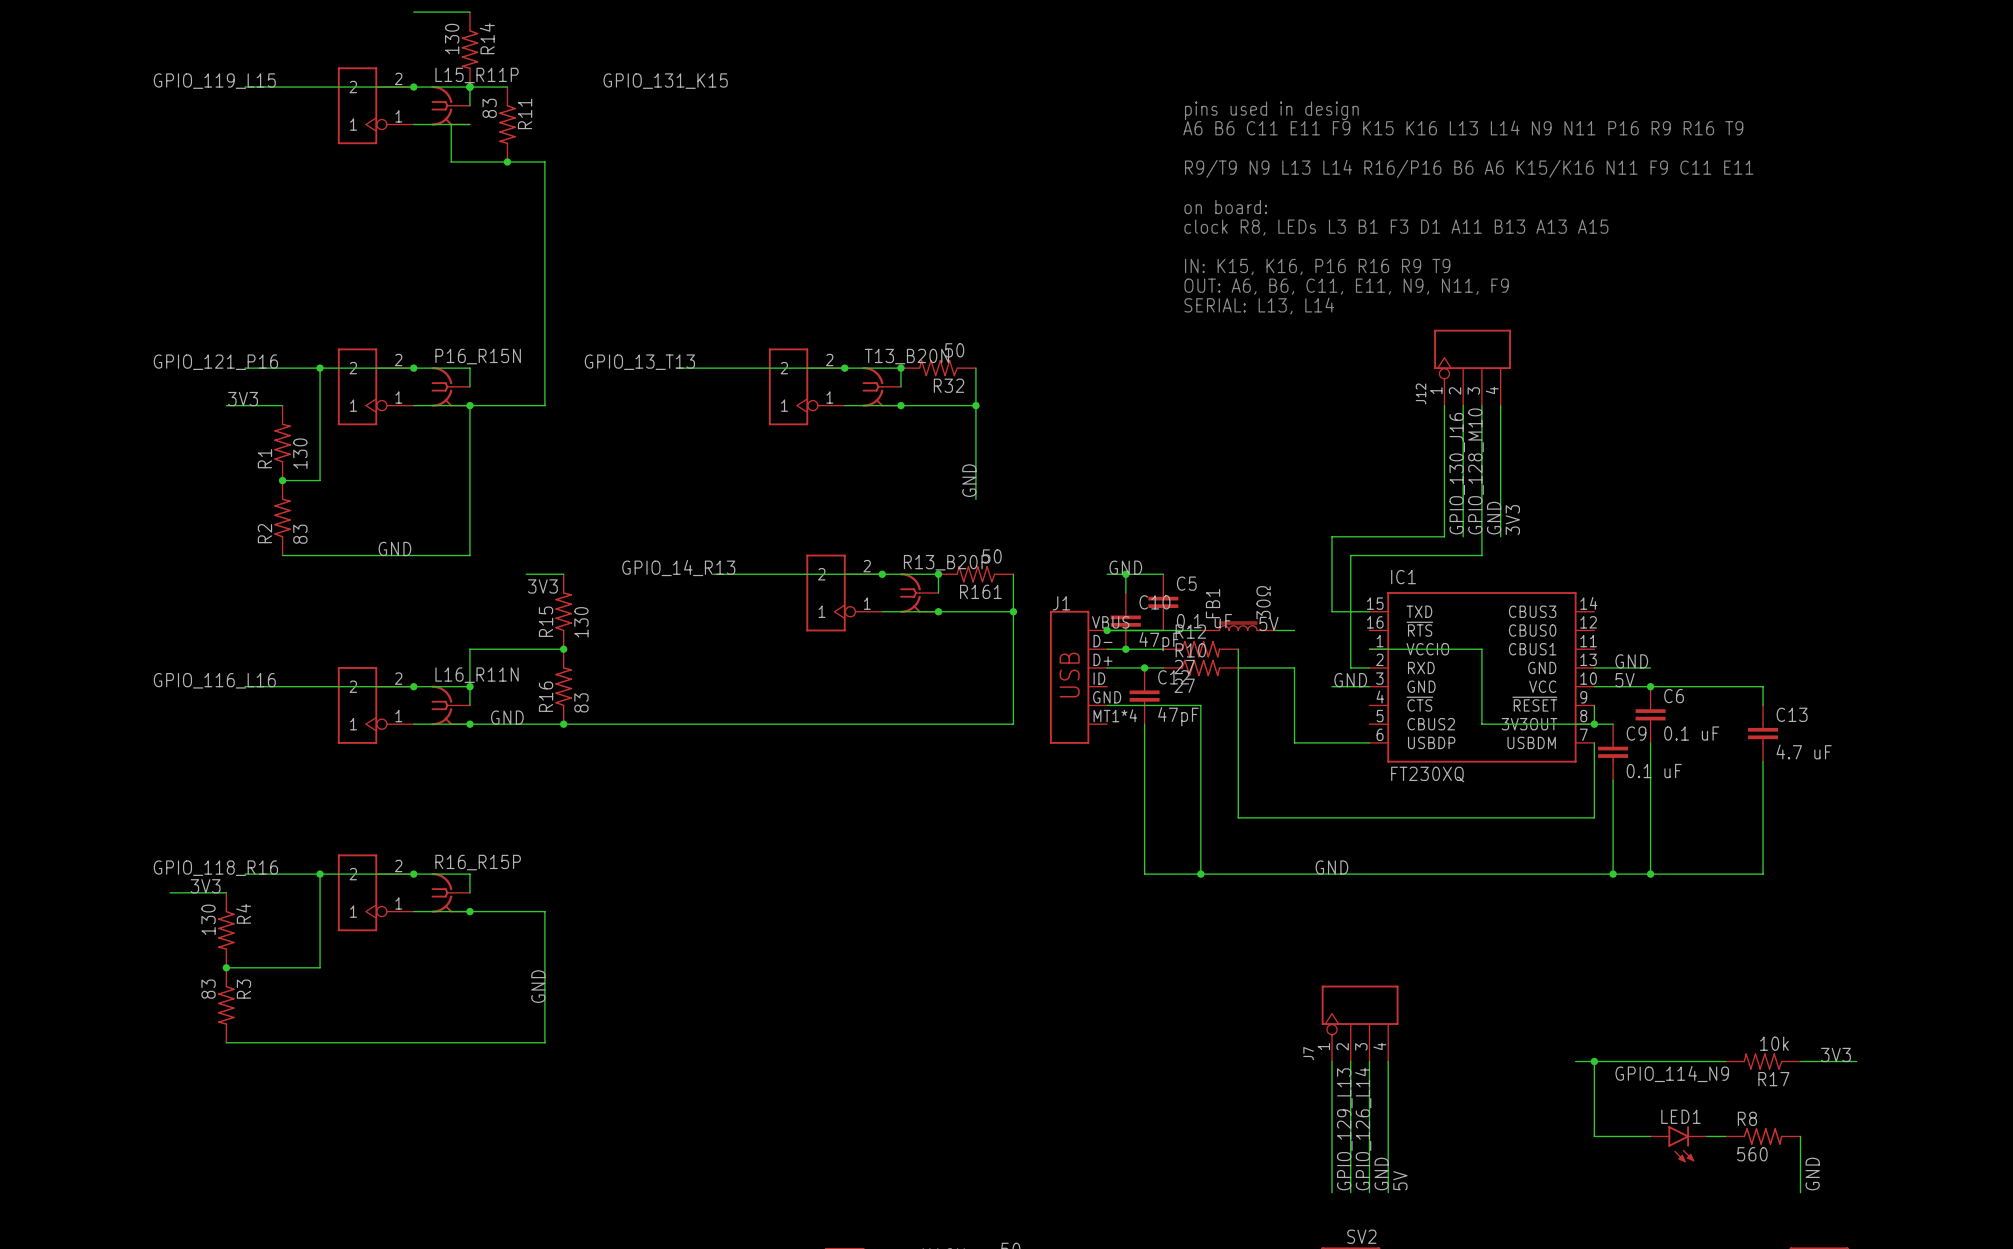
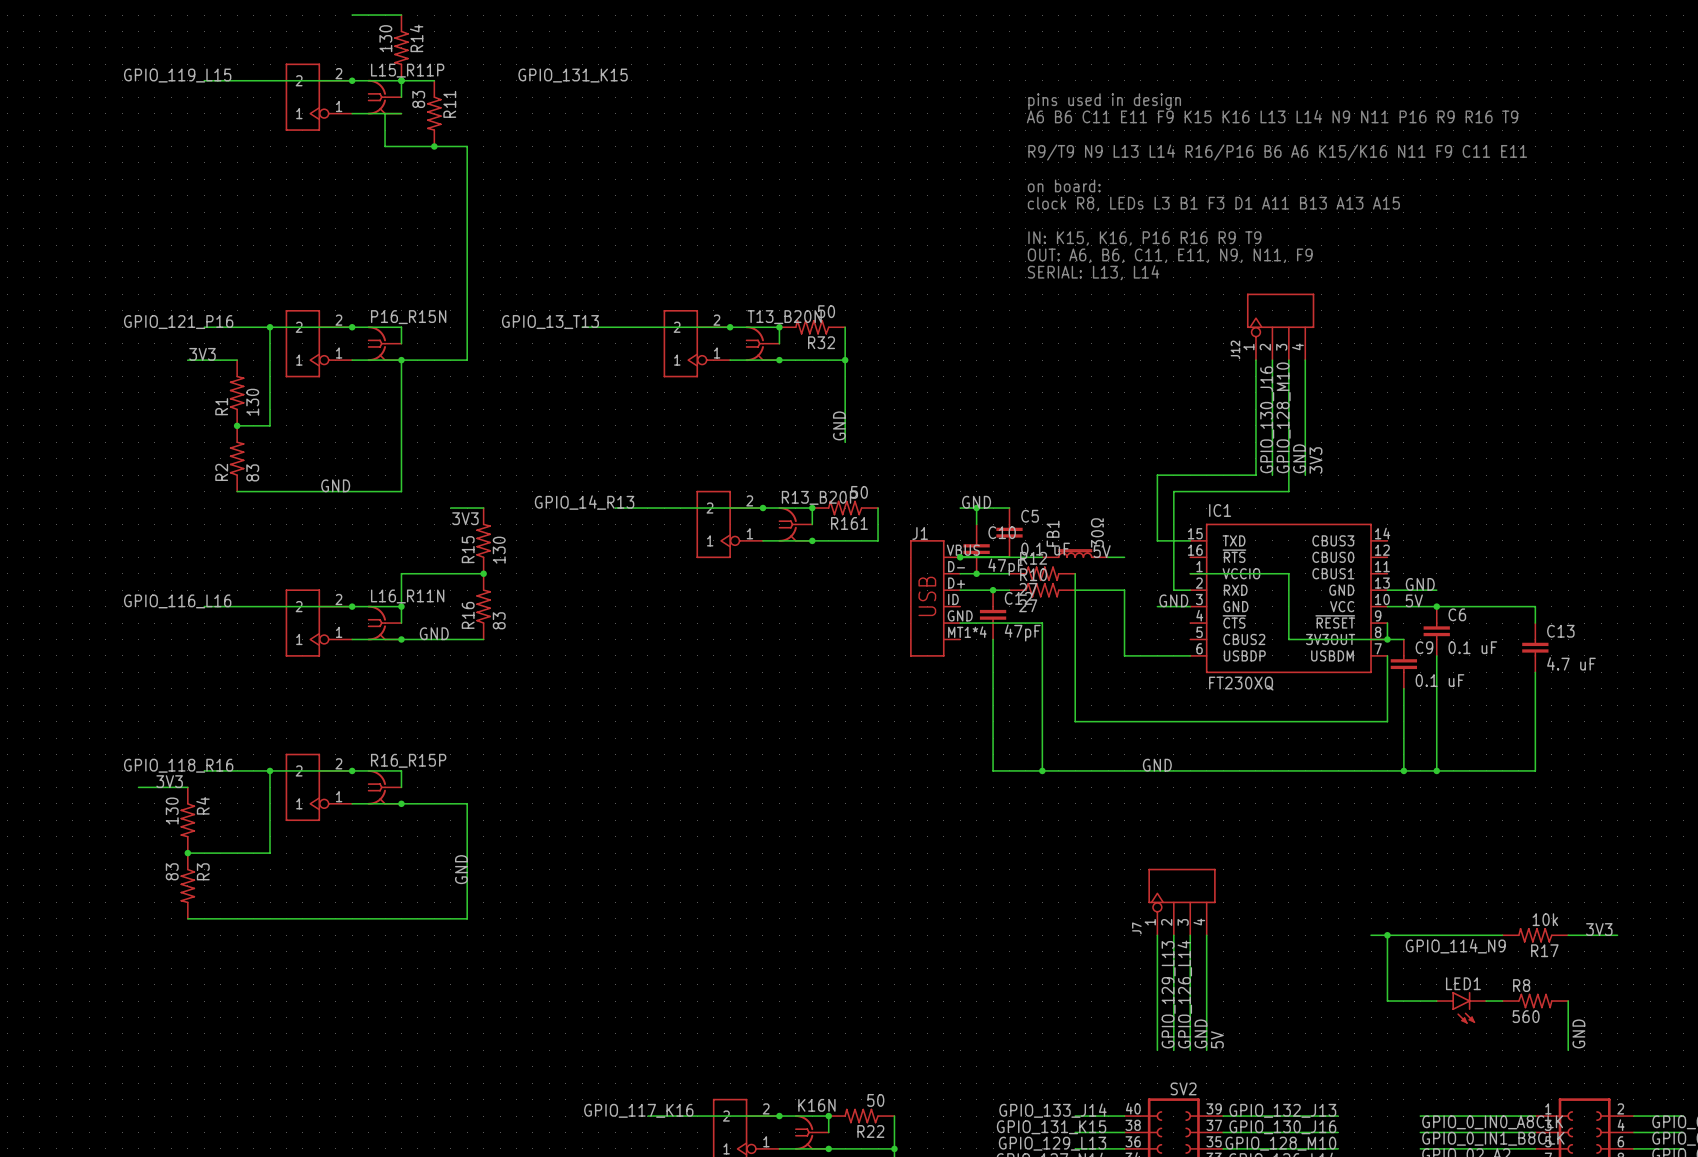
wire: (1013, 611) (1013, 724) (563, 724) -> none
junction: (1013, 611) -> none
junction: (563, 724) -> none

